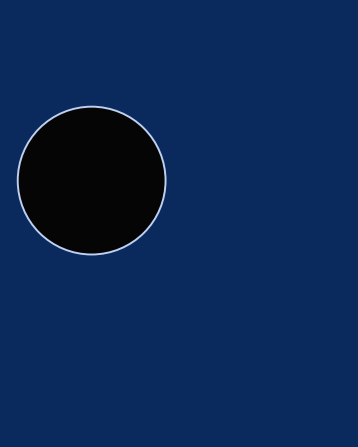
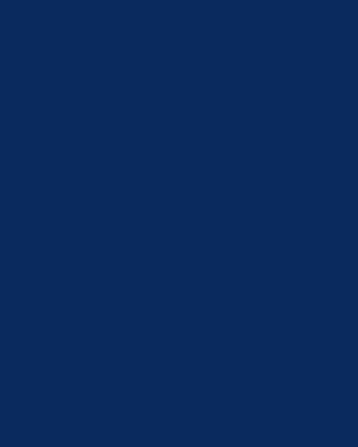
part: (91, 180) -> none

